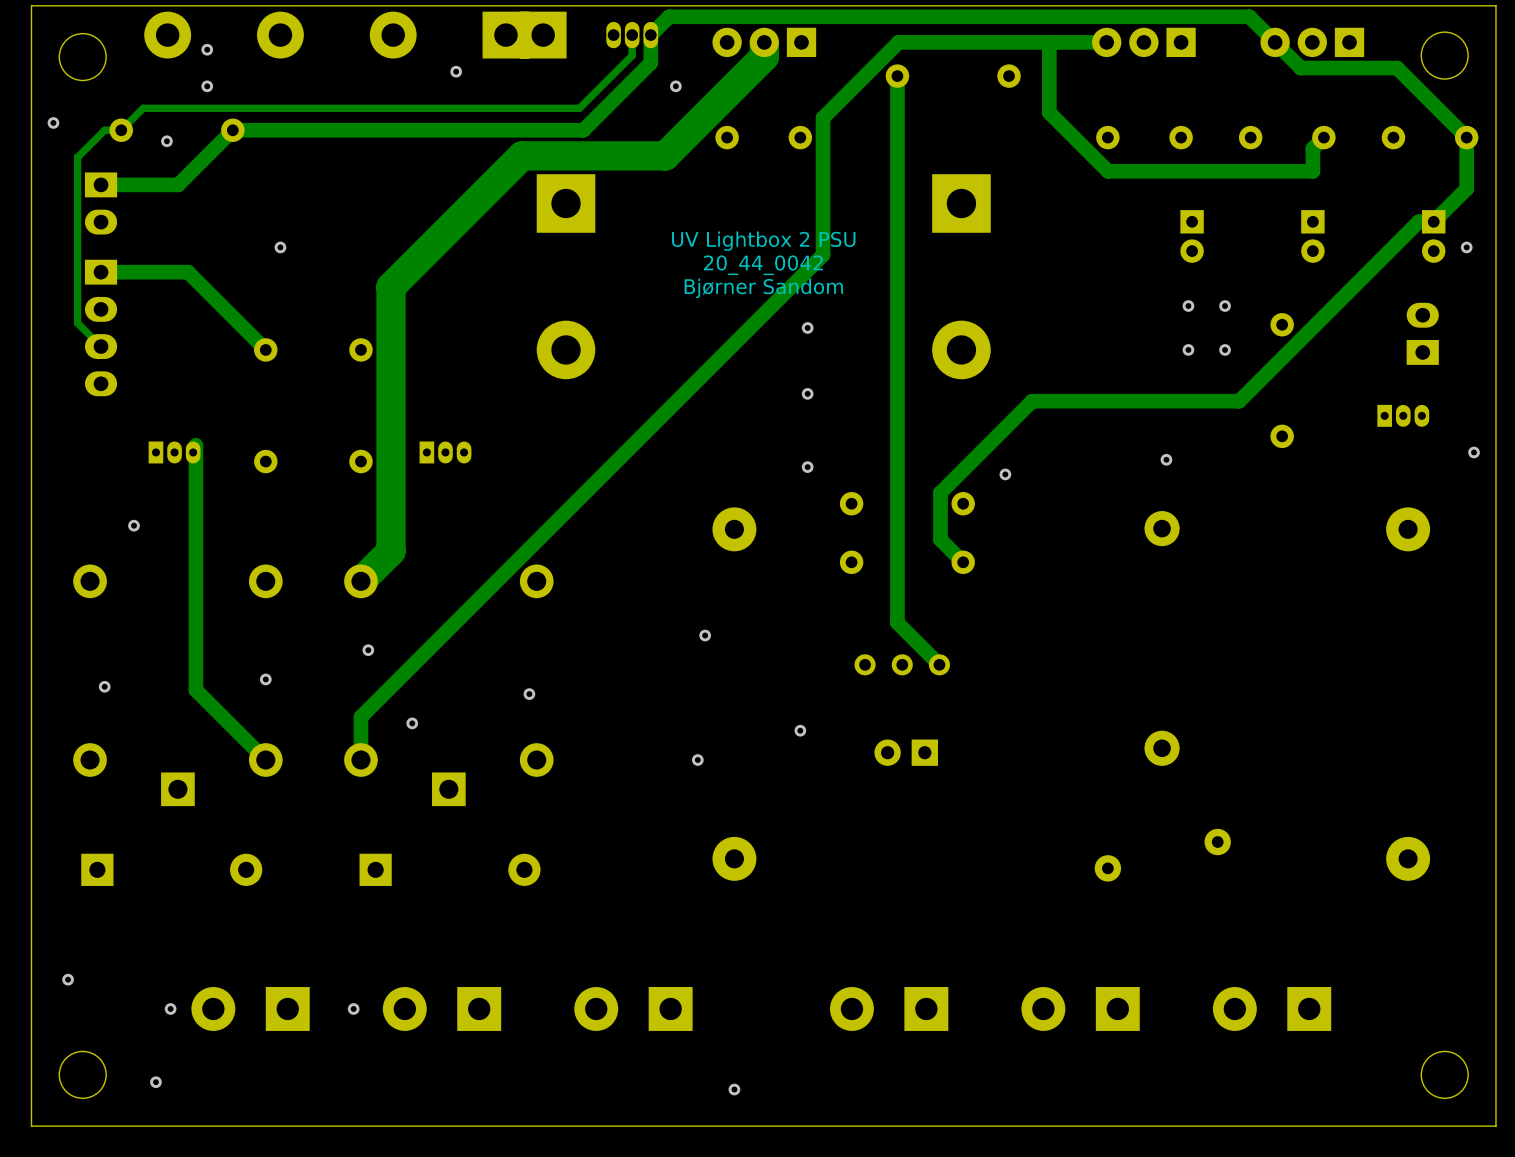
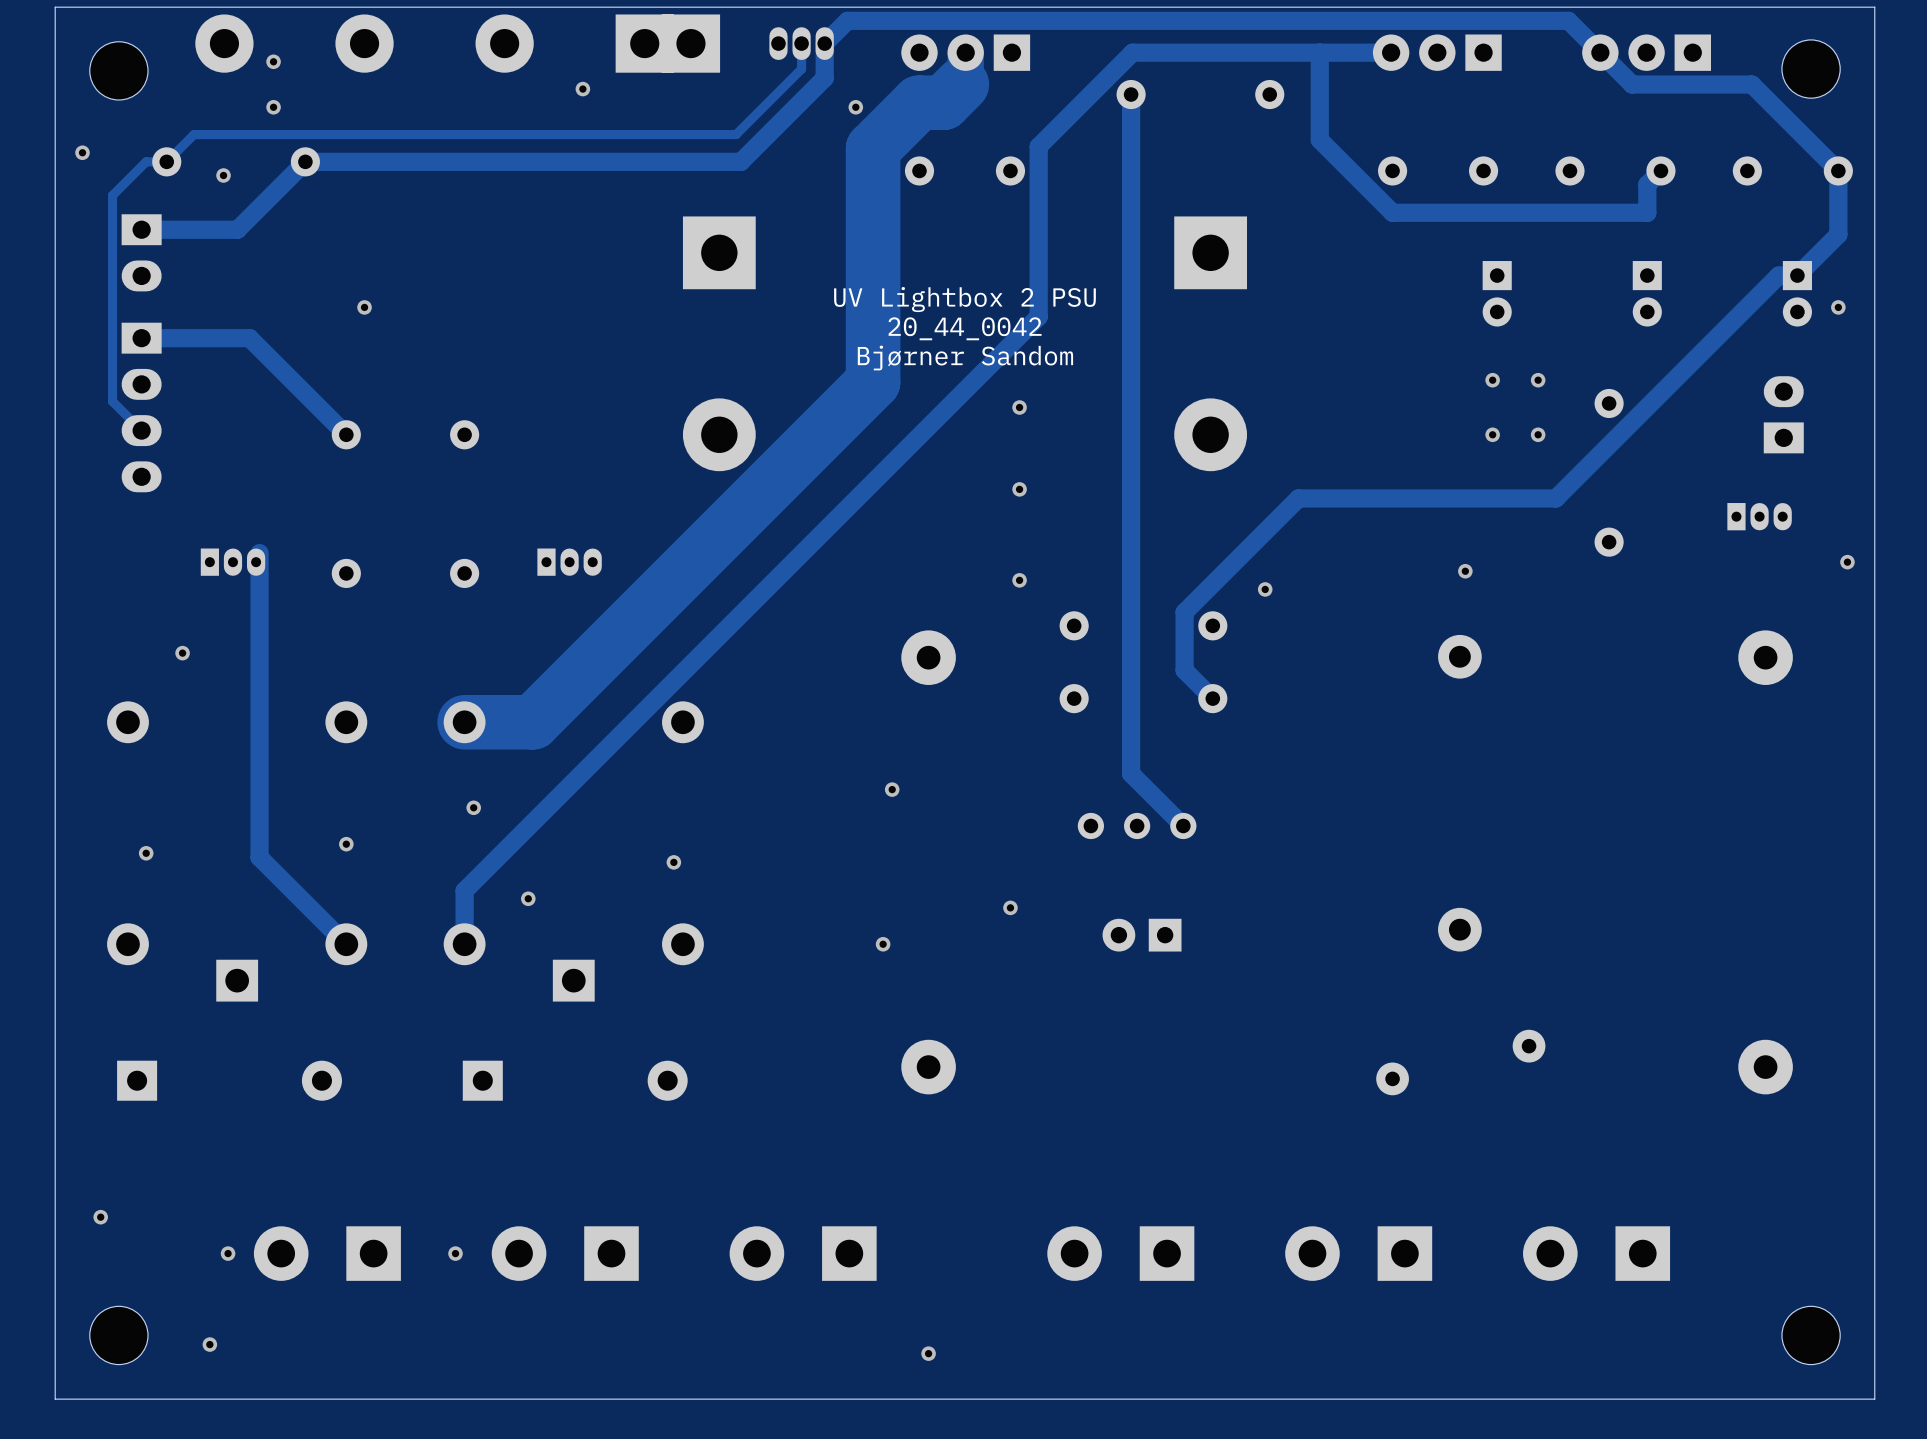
track: (764, 56) (665, 155) (522, 155) (391, 286) (391, 551) (360, 581) -> (961, 84) (943, 102) (919, 102) (873, 148) (873, 382) (532, 722) (464, 722)

